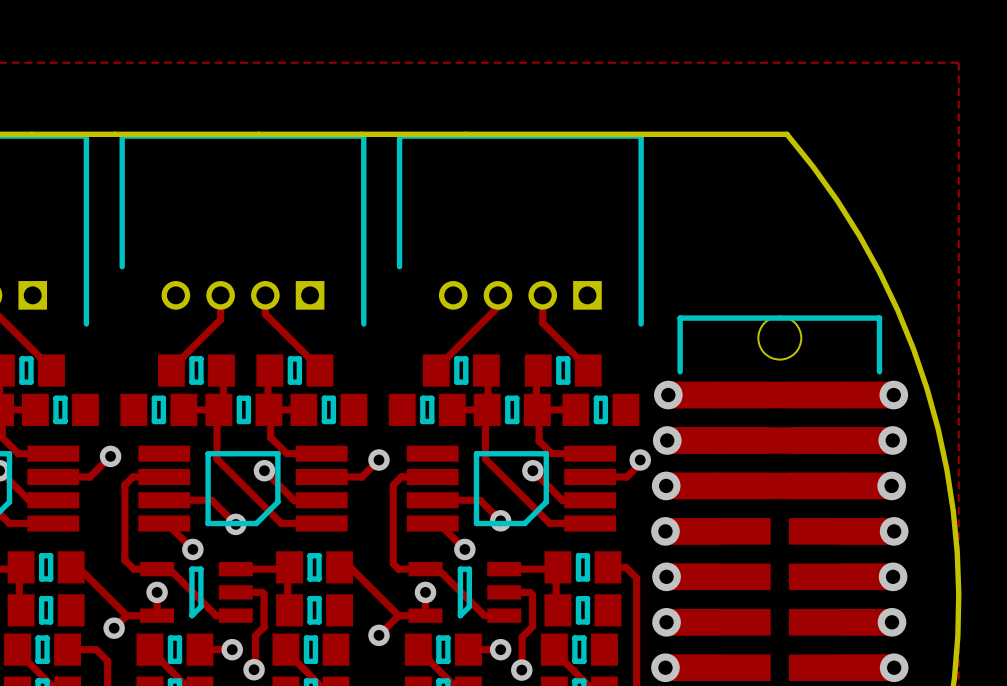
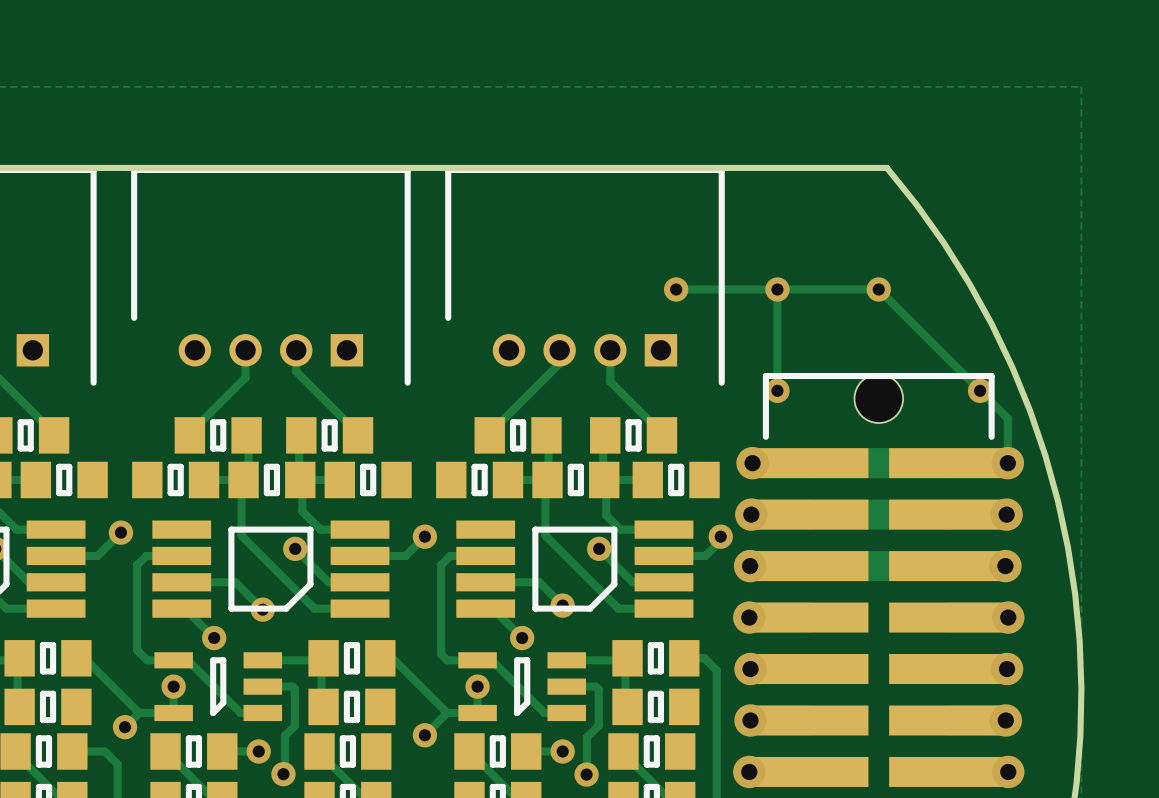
track: none -> (676, 289) (878, 289) (1007, 418) (1007, 463)
via: none -> (676, 289)
track: none -> (777, 289) (777, 390)
via: none -> (777, 289)
via: none -> (878, 289)
via: none -> (777, 390)
via: none -> (980, 390)

